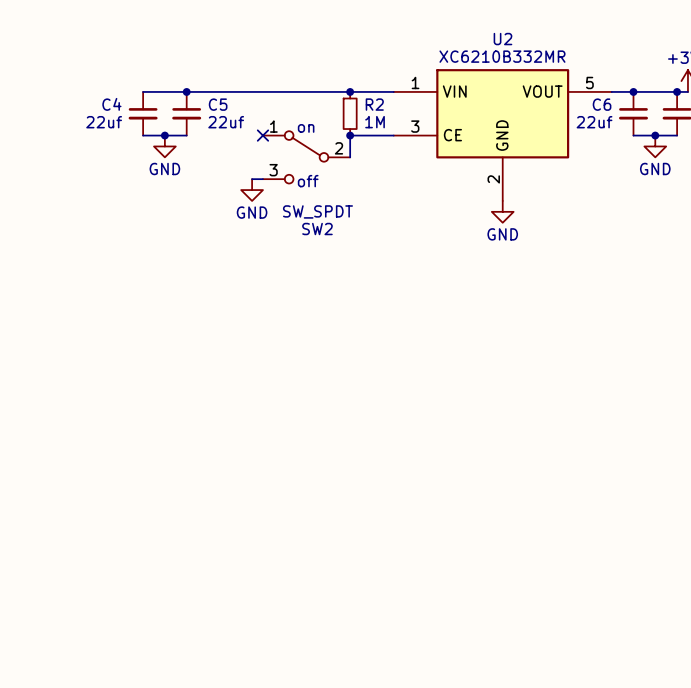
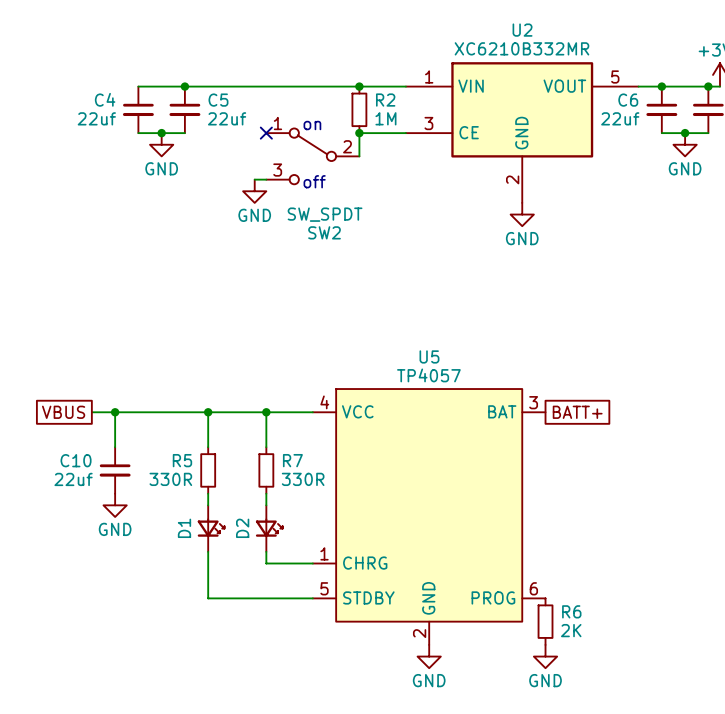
global label: none -> VBUS (63, 412)
wire: none -> (91, 412) (312, 412)
wire: none -> (115, 412) (115, 447)
junction: none -> (115, 412)
wire: none -> (208, 412) (208, 447)
junction: none -> (208, 412)
wire: none -> (266, 412) (266, 447)
junction: none -> (266, 412)
global label: none -> BATT+ (577, 412)
C10: none -> 22uf (115, 470)
R5: none -> 330R (208, 470)
R7: none -> 330R (266, 470)
wire: none -> (208, 493) (208, 505)
wire: none -> (266, 493) (266, 505)
power symbol: none -> GND (115, 505)
U5: none -> TP4057 (429, 516)
D1: none -> (211, 528)
D2: none -> (269, 528)
wire: none -> (208, 551) (208, 598) (312, 598)
wire: none -> (266, 551) (266, 563) (312, 563)
R6: none -> 2K (545, 621)
power symbol: none -> GND (429, 656)
power symbol: none -> GND (545, 656)

